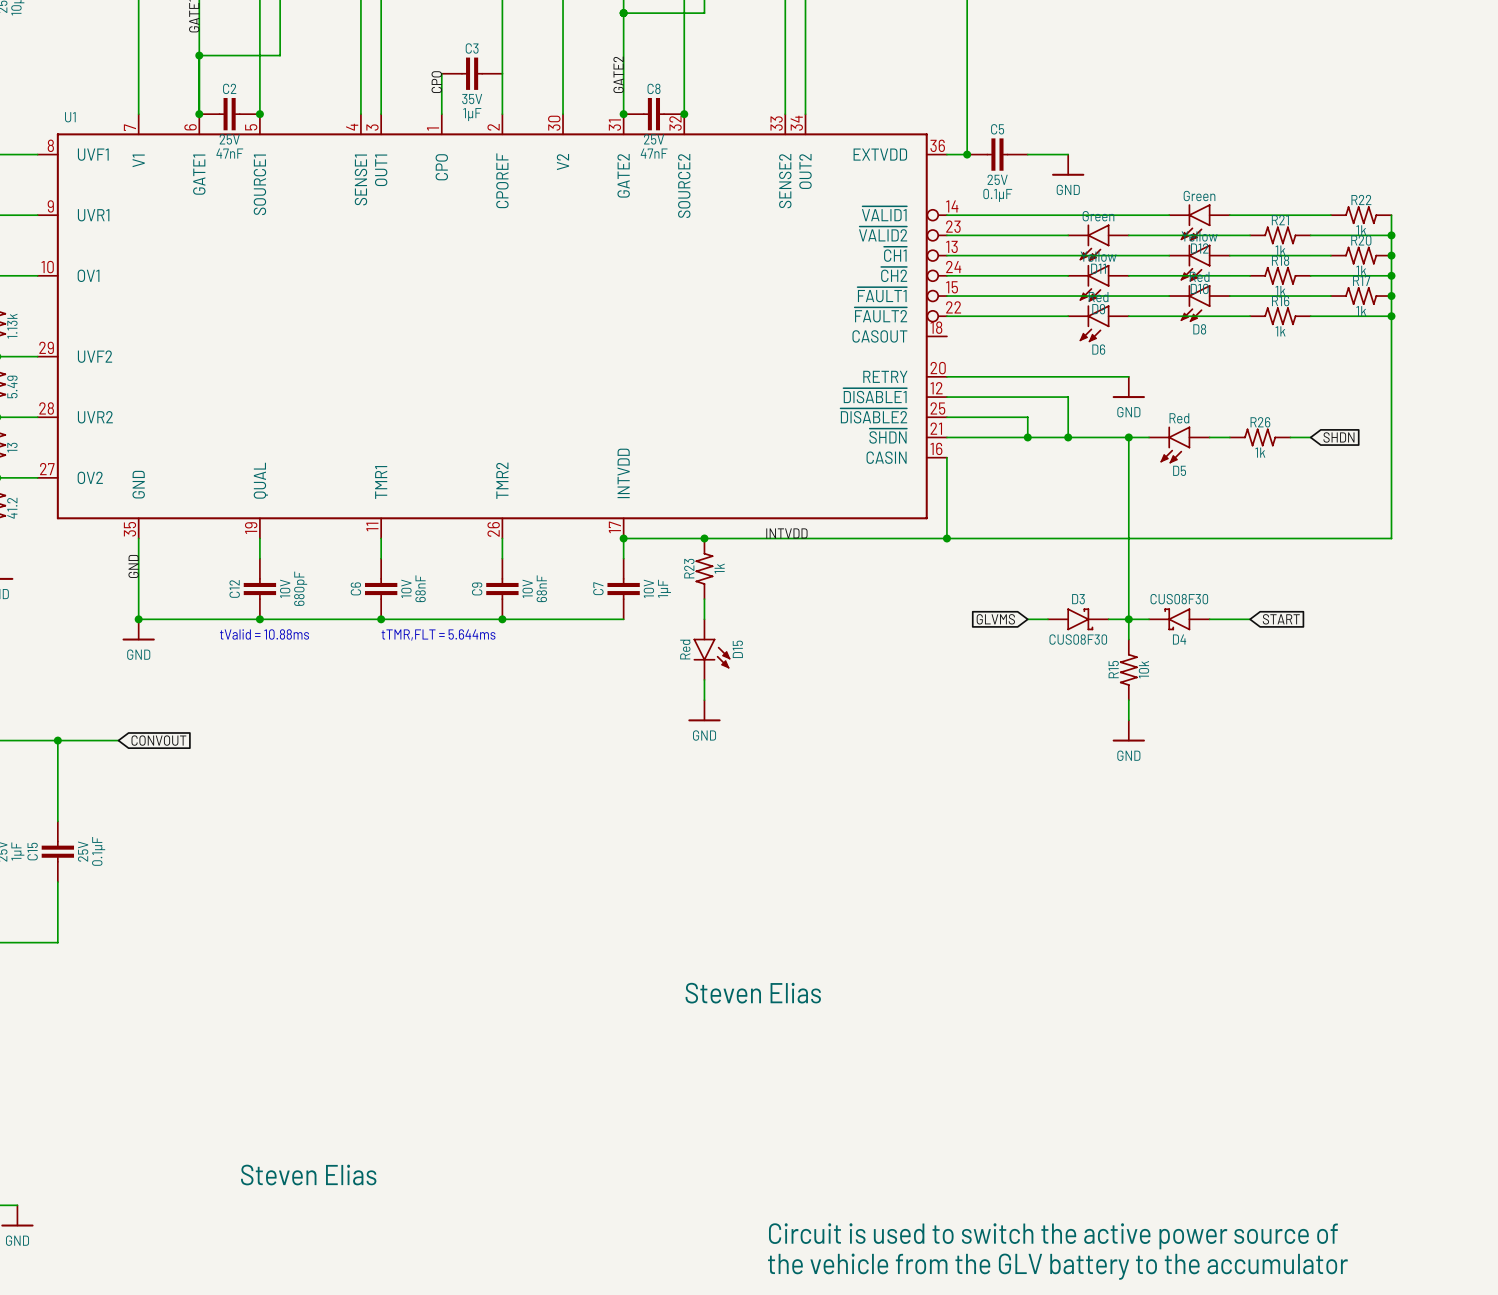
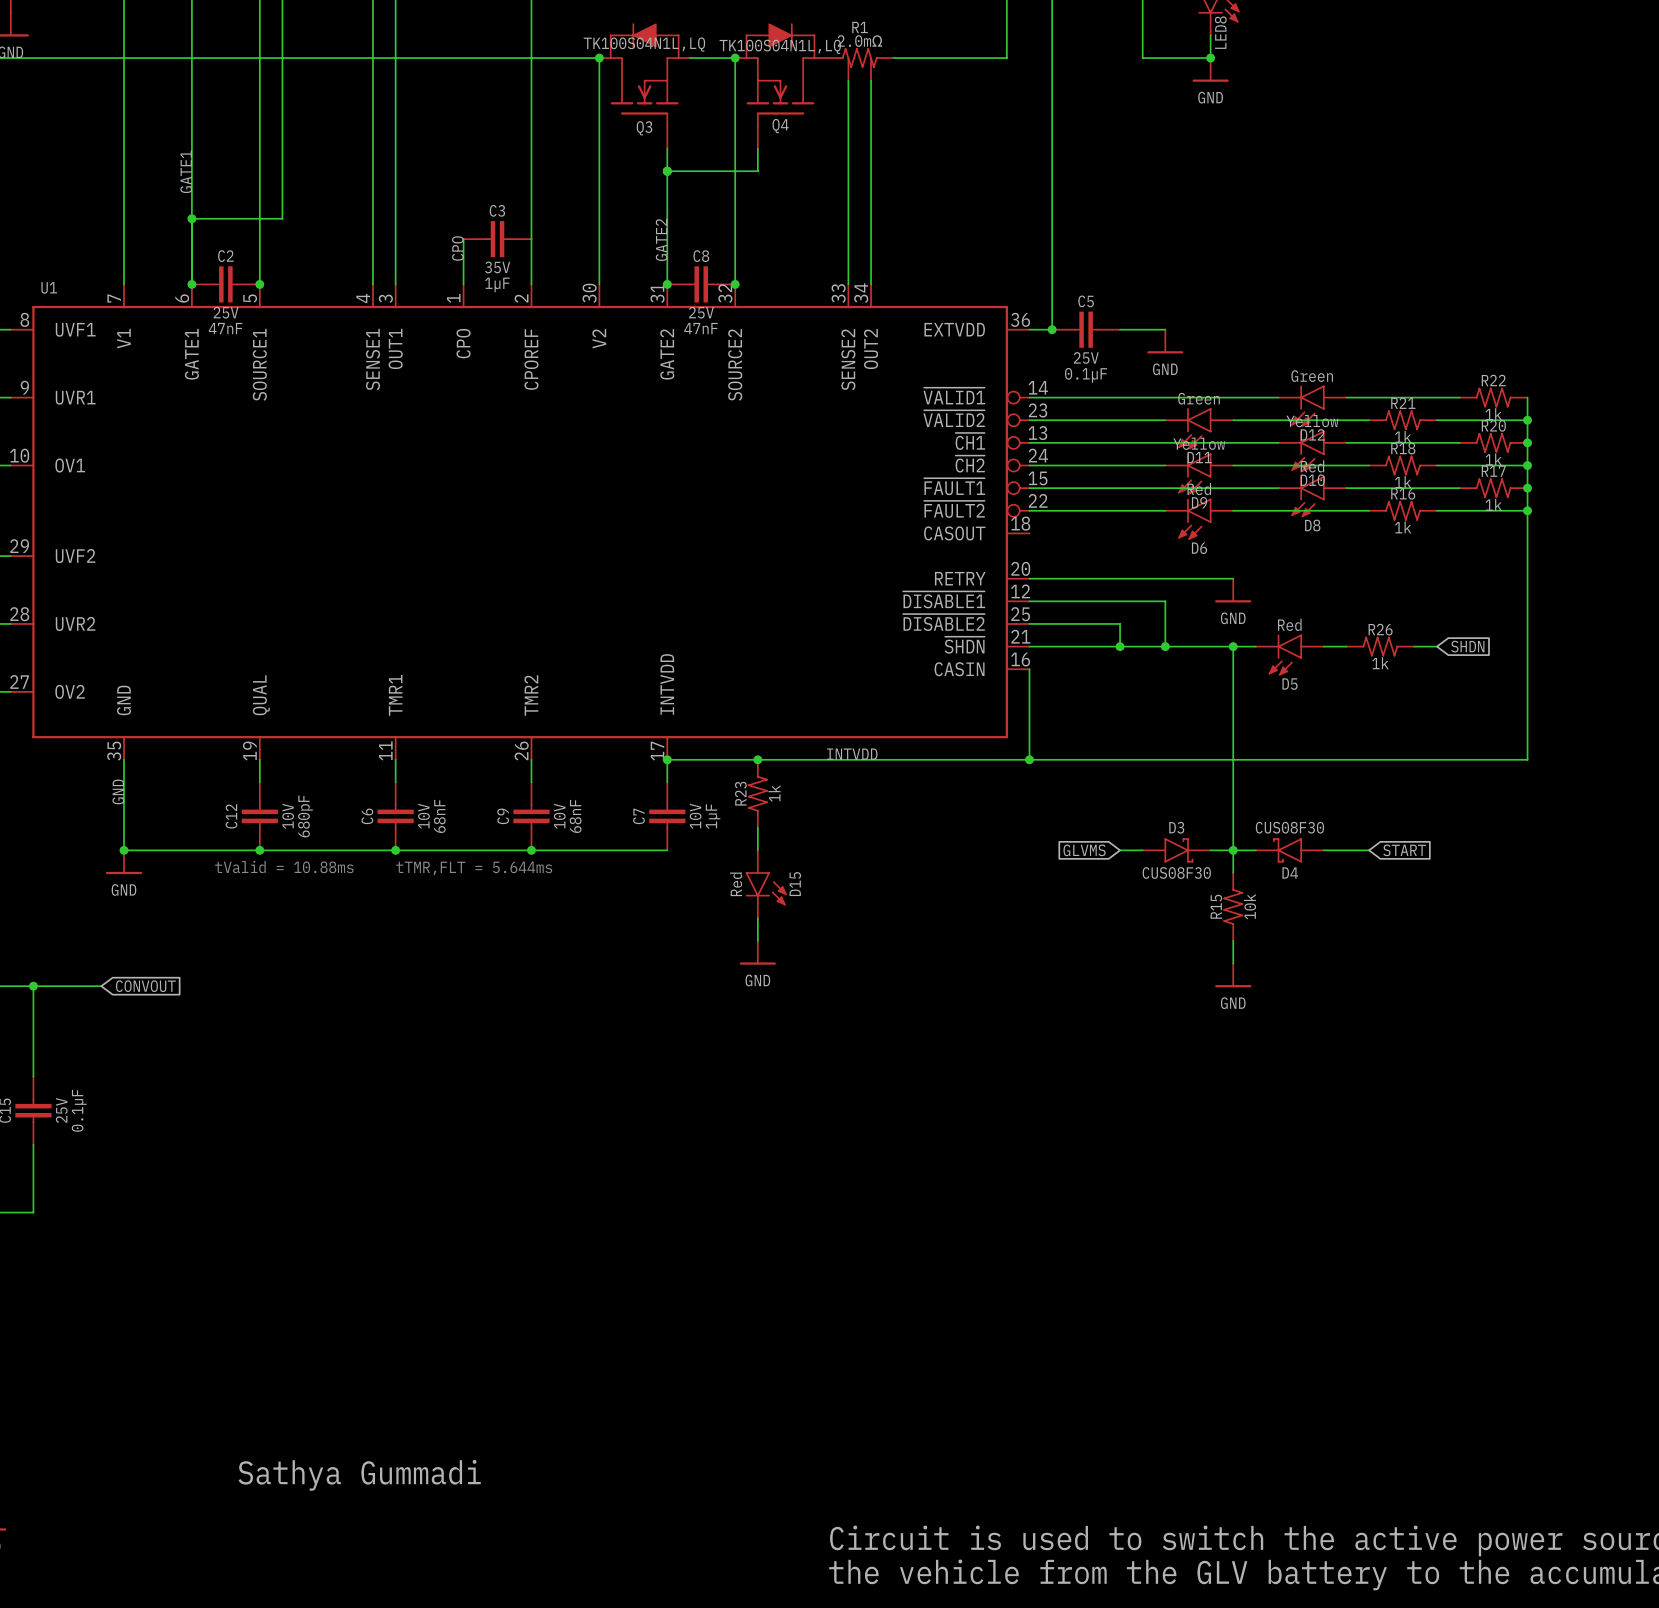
text: Steven Elias (753, 993) -> none
text: Steven Elias (308, 1175) -> Sathya Gummadi (359, 1475)

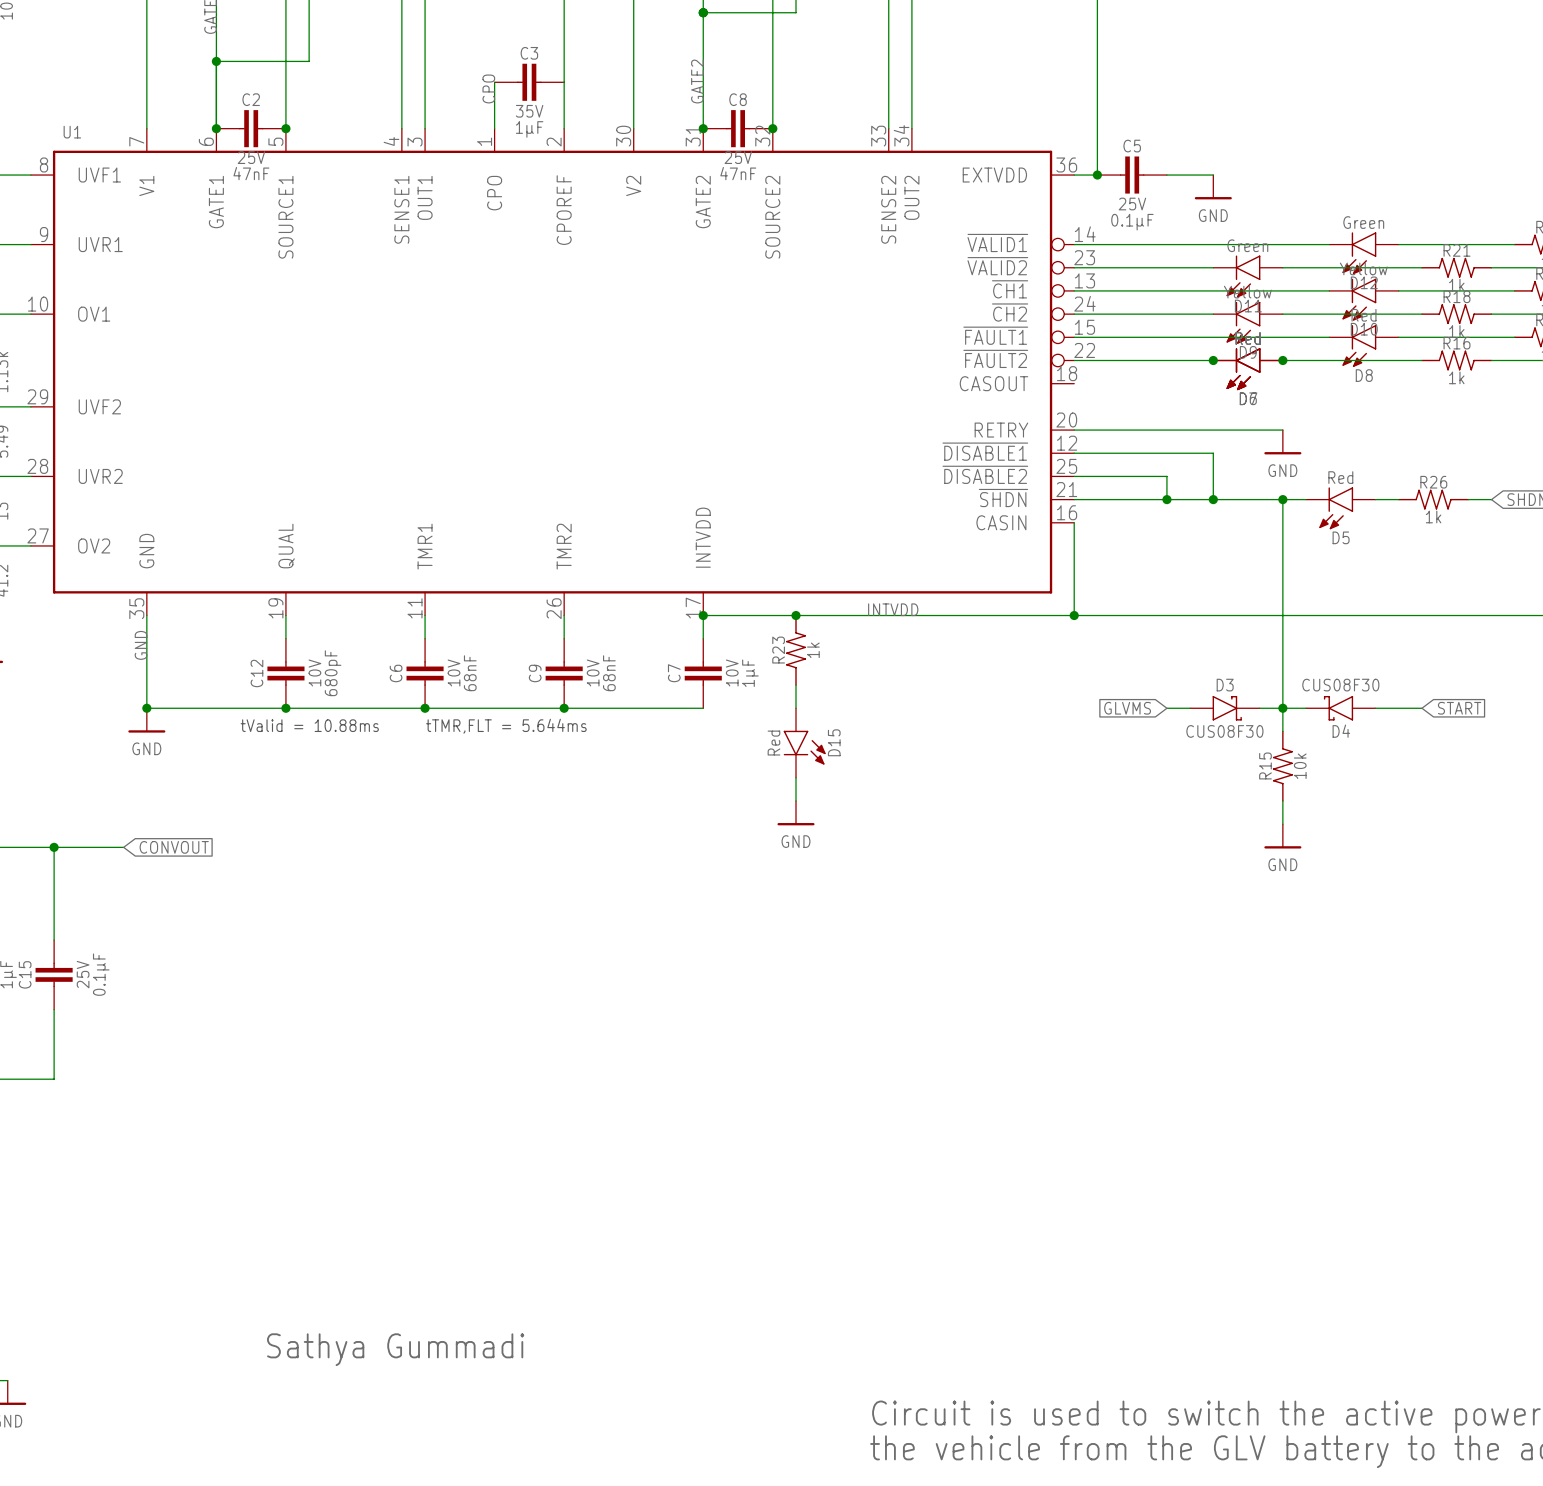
junction: none -> (1213, 360)
junction: none -> (1282, 360)
part: none -> (1248, 369)

